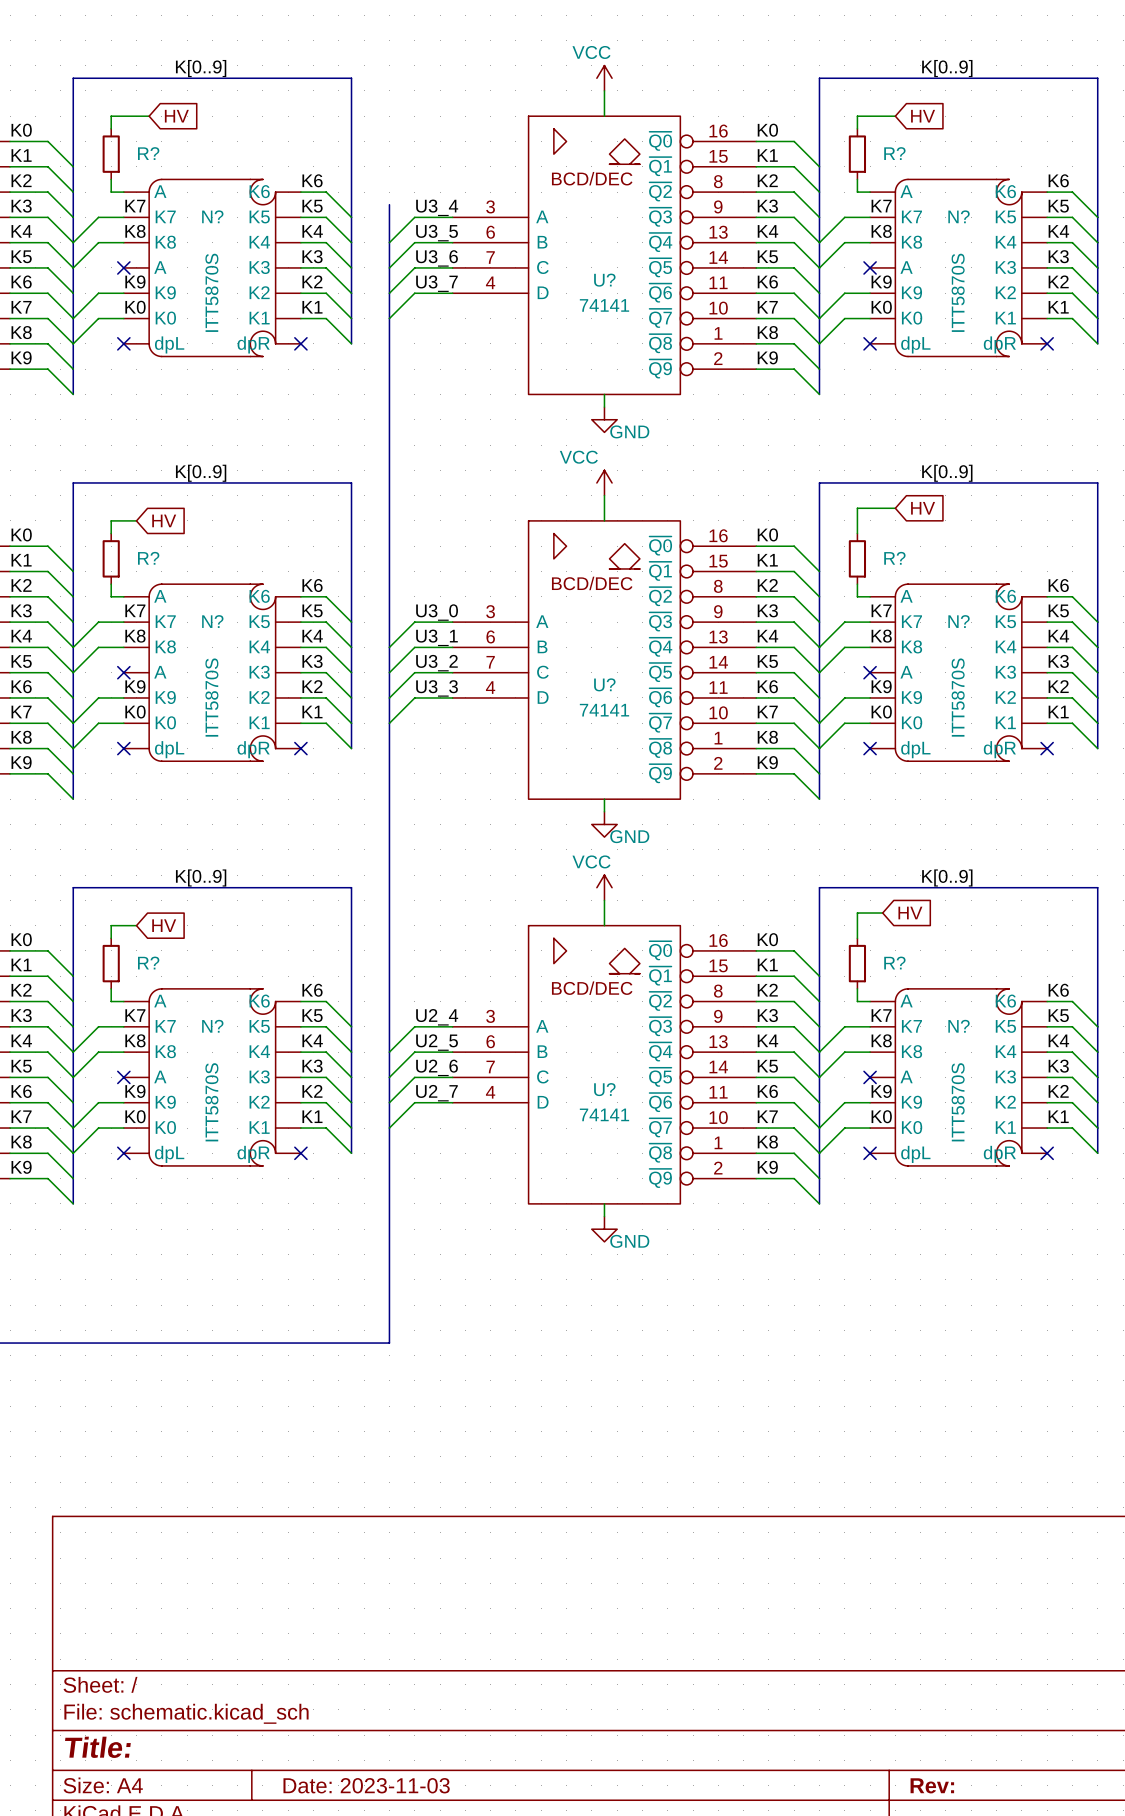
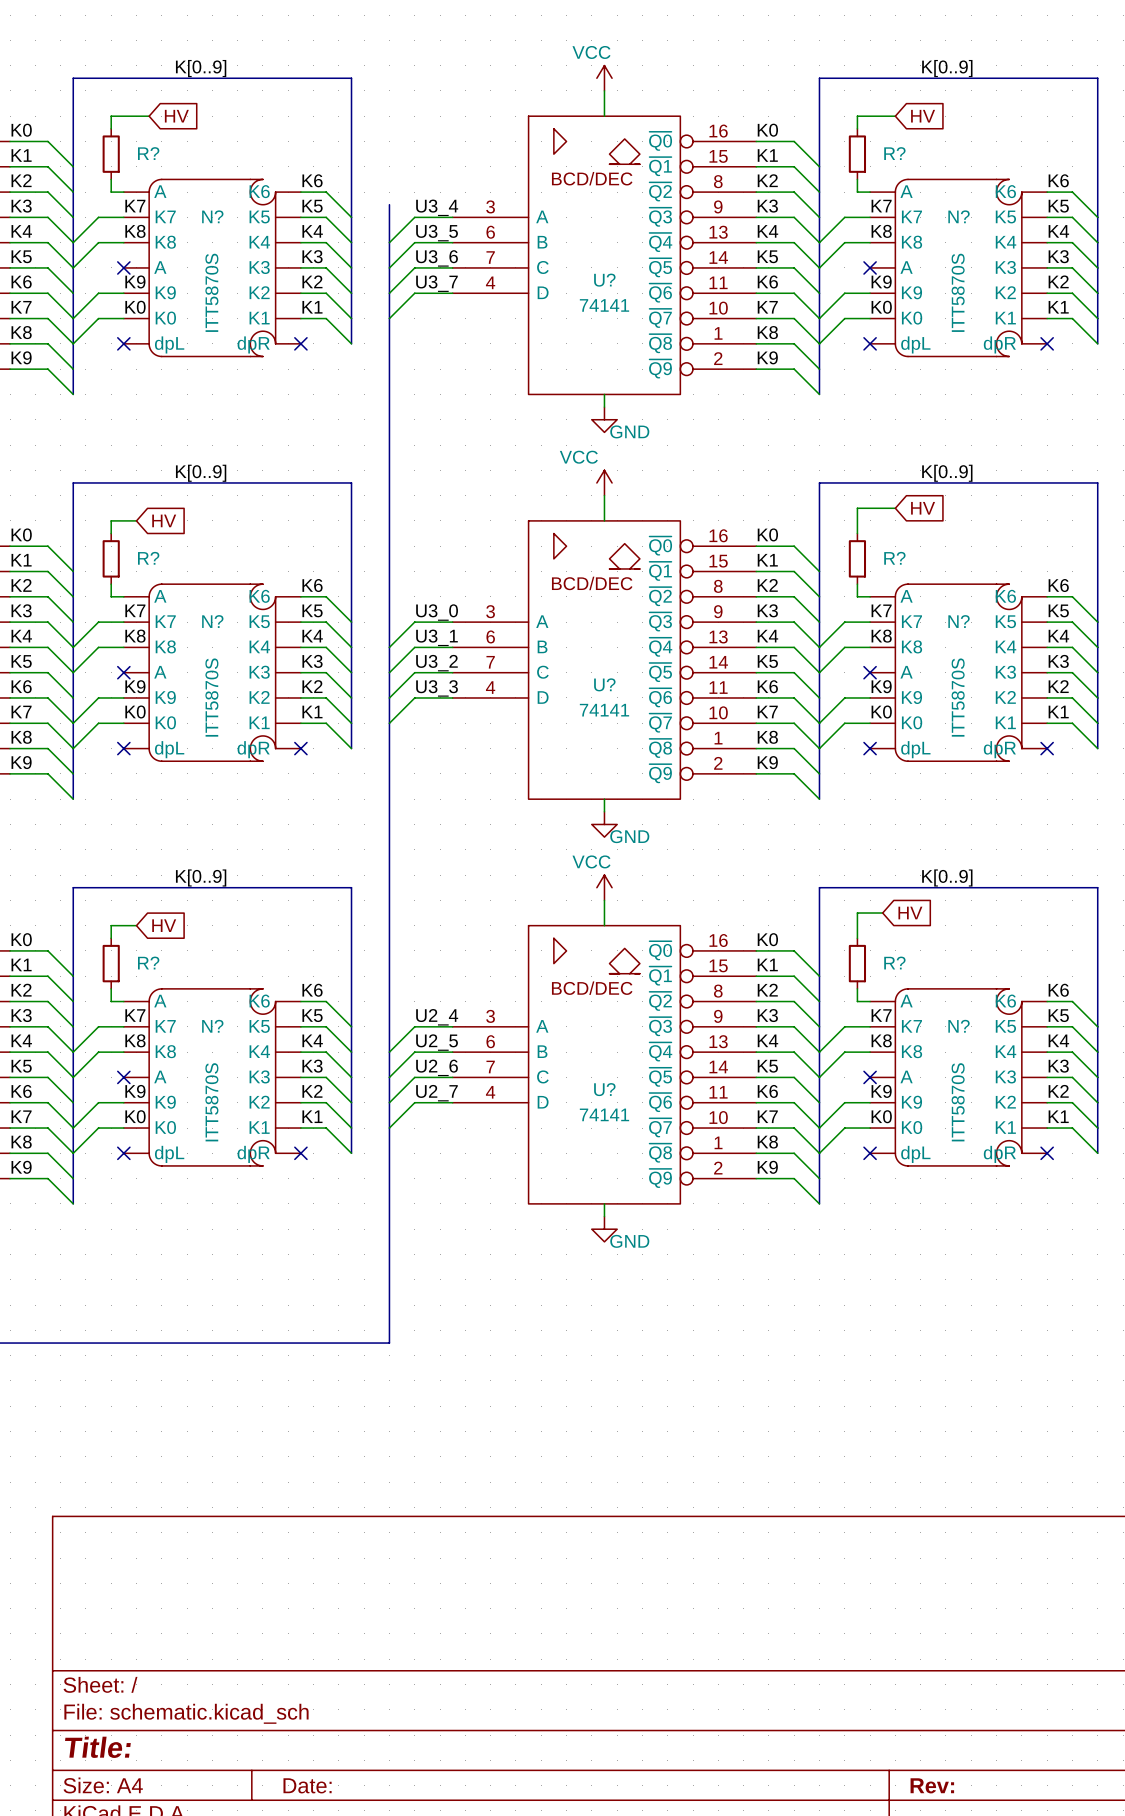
title block: Date: 2023-11-03 (366, 1785) -> Date: (307, 1785)

